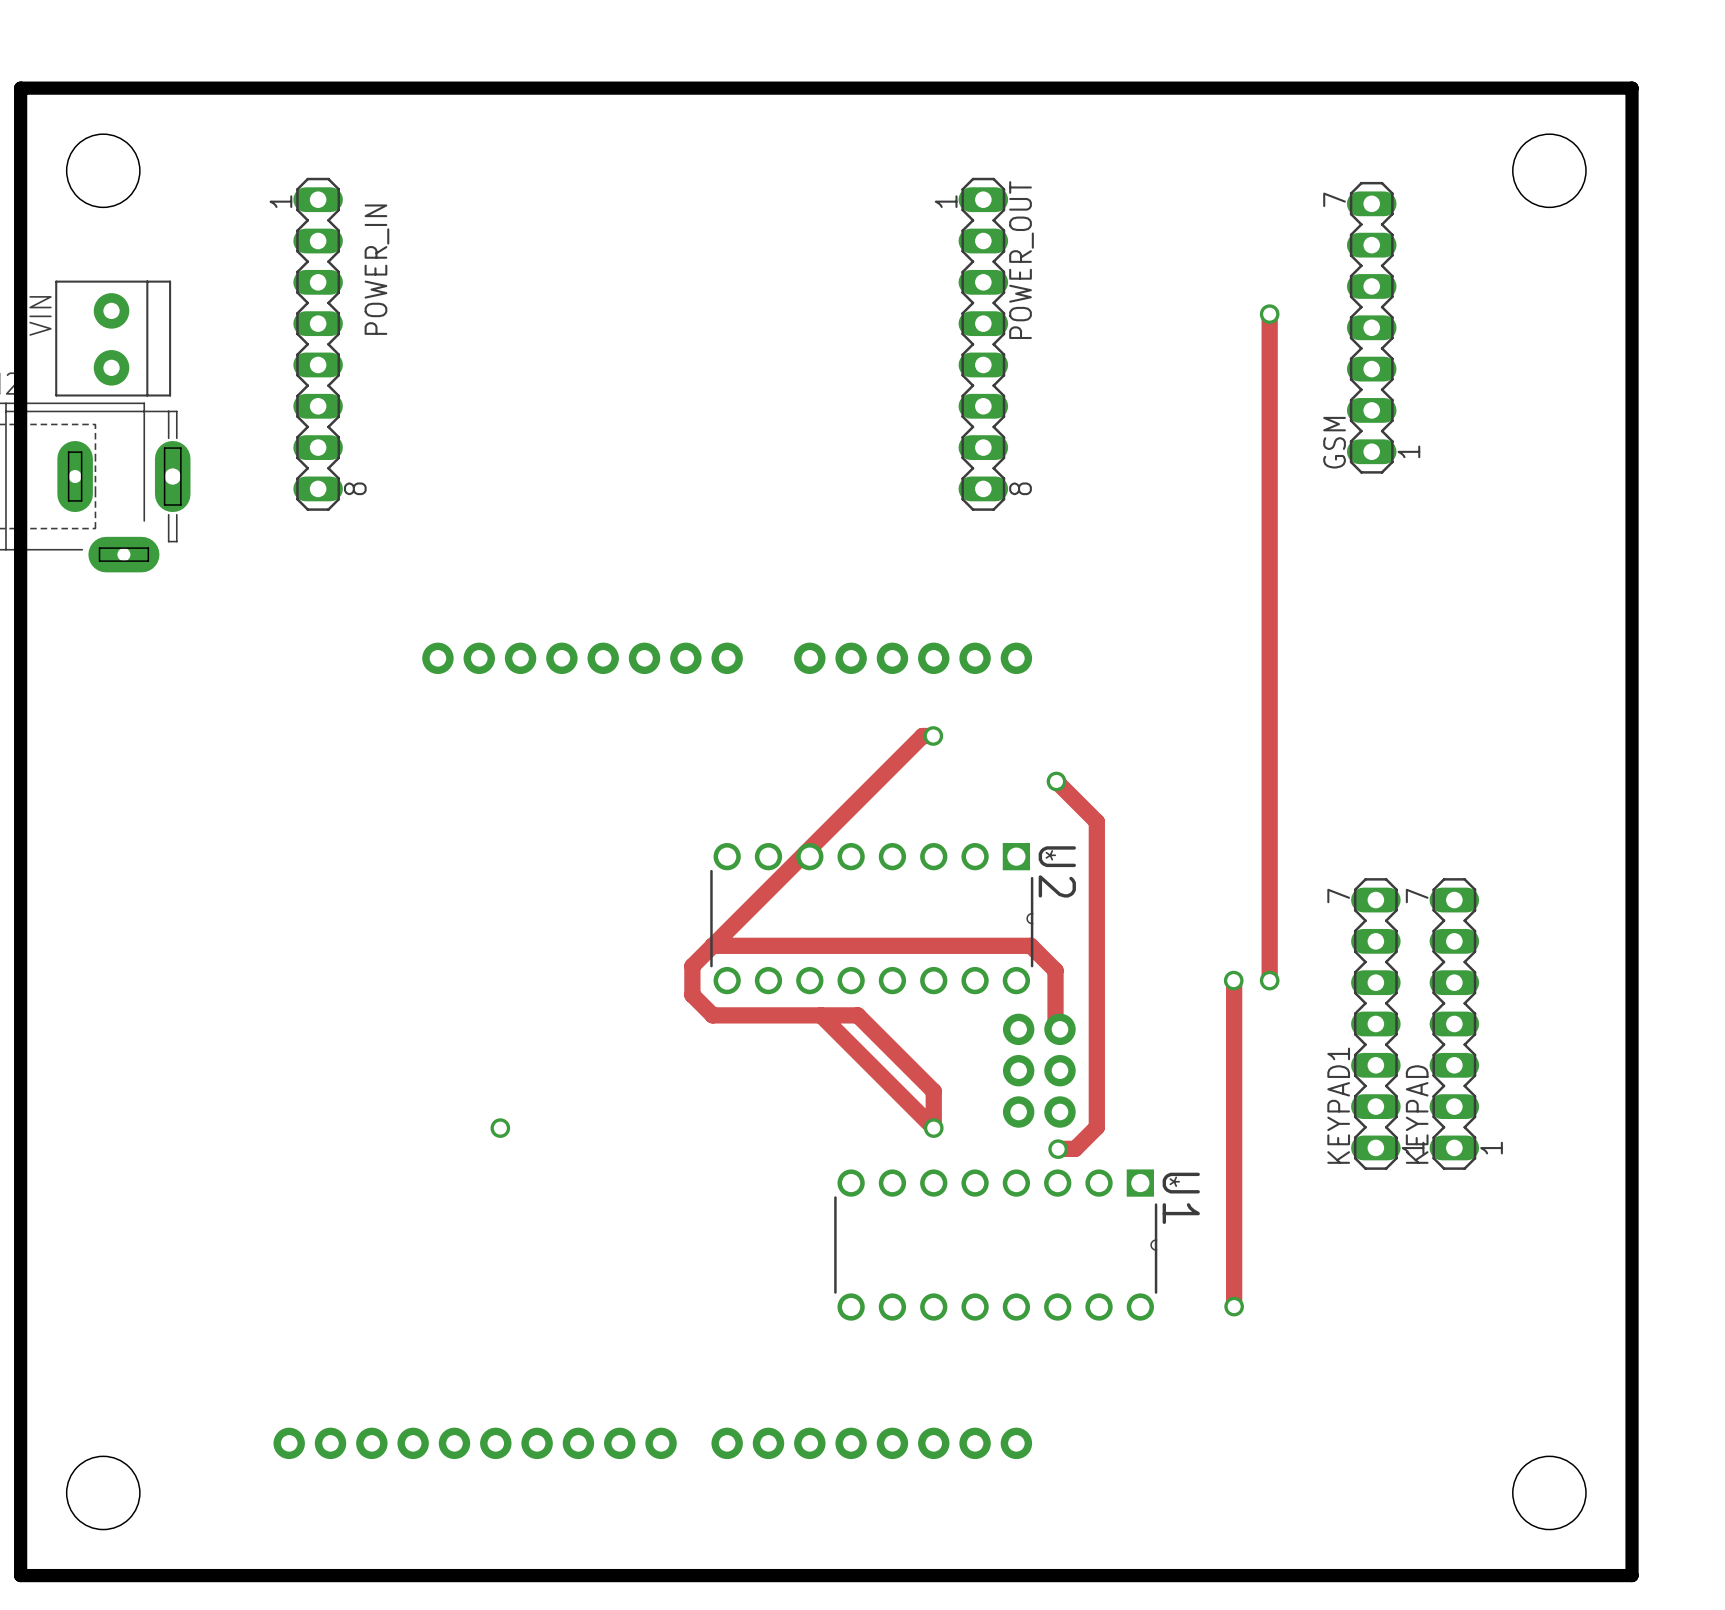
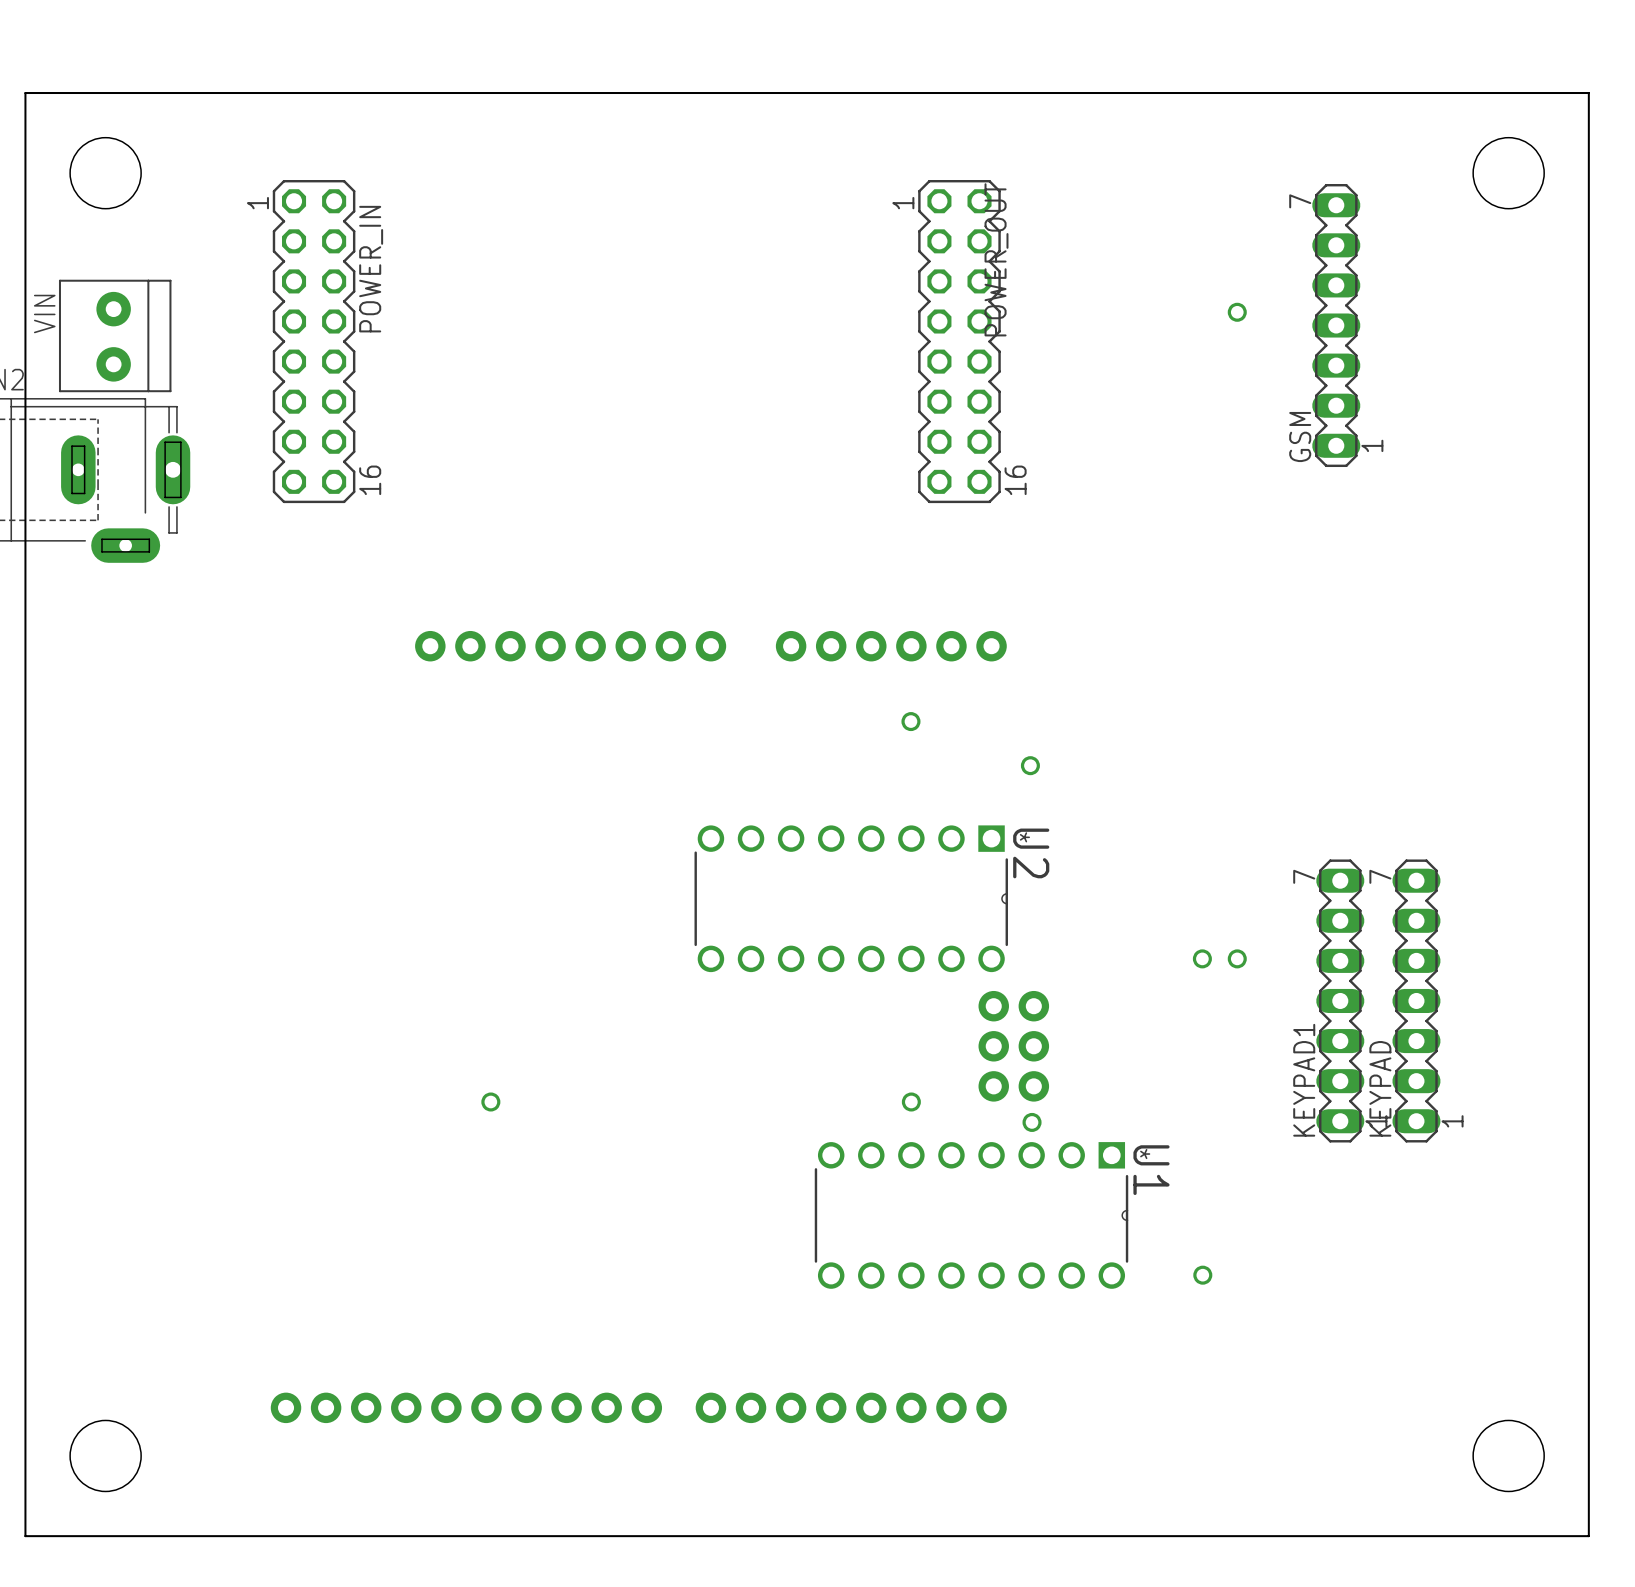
board edge width: thick (20, 88) (1632, 88) (1632, 1575) (20, 1575) (20, 88) -> thin (25, 93) (1588, 93) (1588, 1536) (25, 1536) (25, 93)
POWER_IN footprint: [293, 177, 343, 511] -> [272, 179, 356, 504]
POWER_OUT footprint: [958, 177, 1009, 511] -> [918, 179, 1001, 504]
track: (1269, 314) (1269, 980) -> none
track: (933, 736) (922, 736) (692, 966) (692, 995) (712, 1015) (857, 1015) (933, 1091) (933, 1128) (821, 1015) -> none
track: (1056, 781) (1096, 821) (1096, 1127) (1075, 1148) (1058, 1149) -> none
track: (712, 945) (1030, 945) (1055, 970) (1055, 1024) (1059, 1029) -> none
track: (1233, 980) (1234, 1306) -> none

